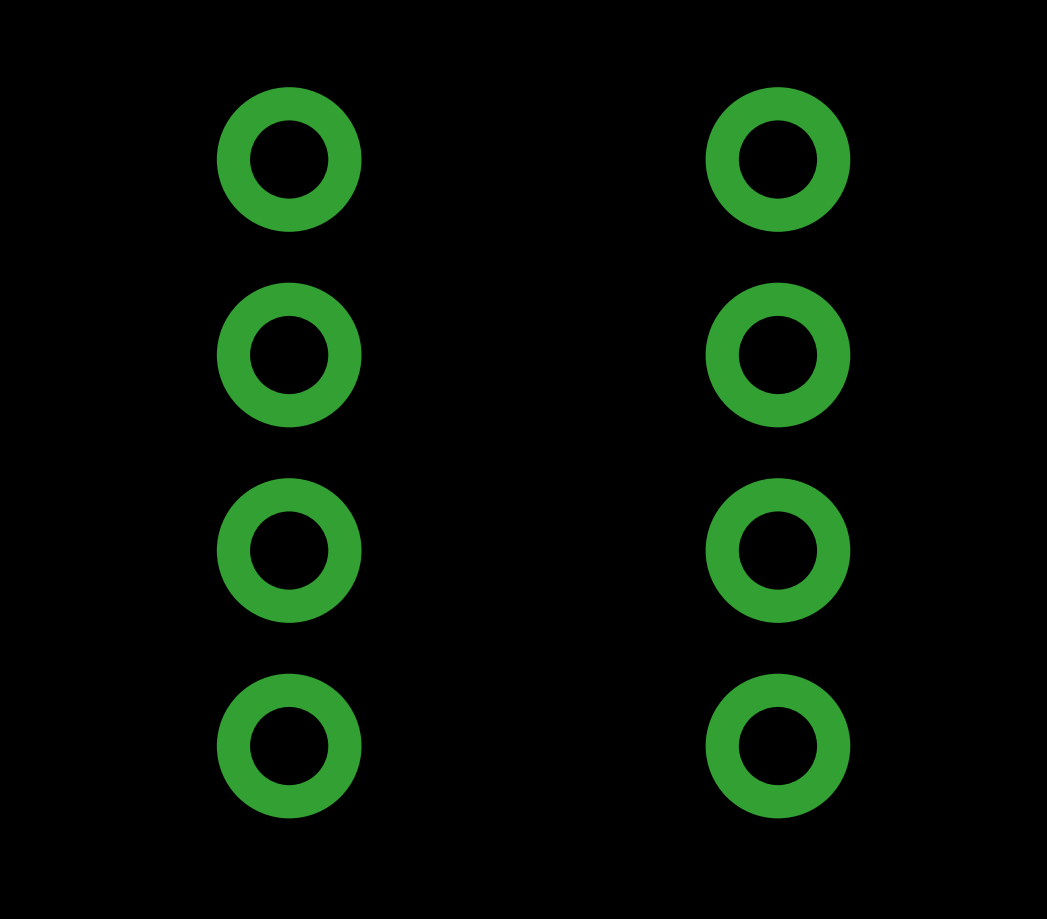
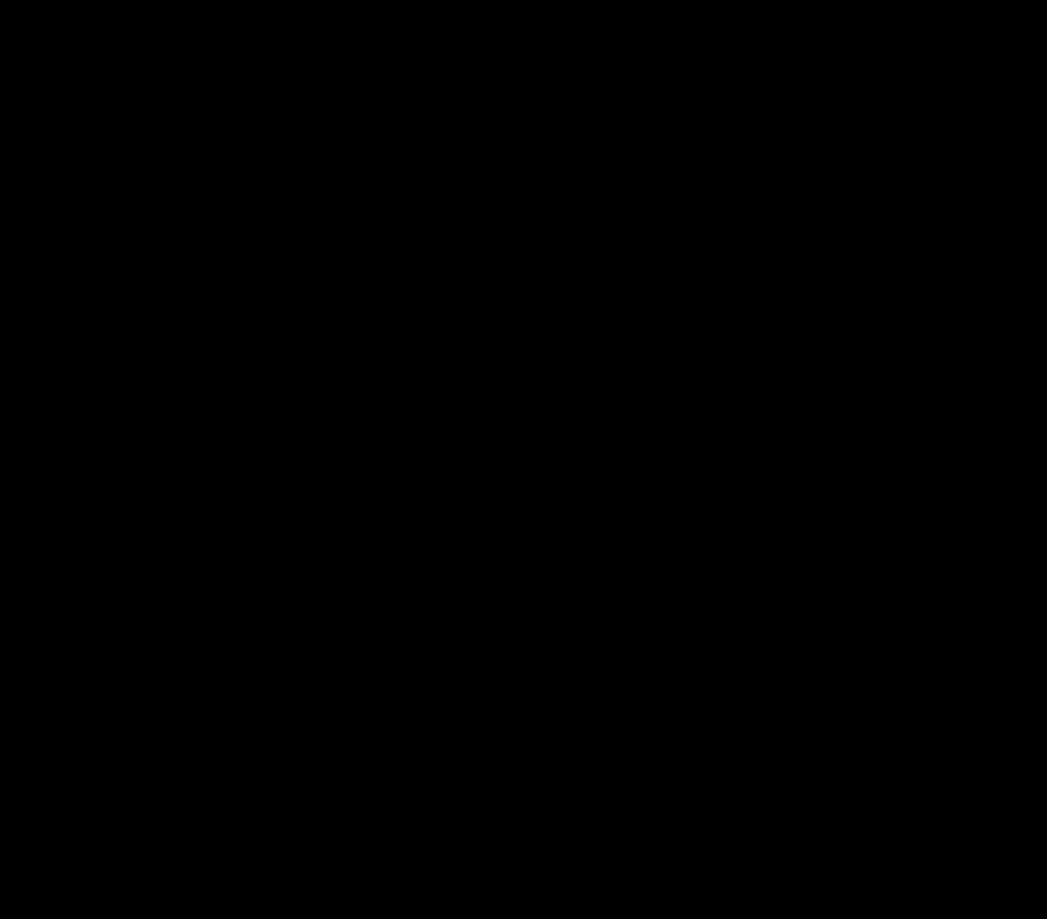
part: (289, 452) -> none
part: (777, 452) -> none

